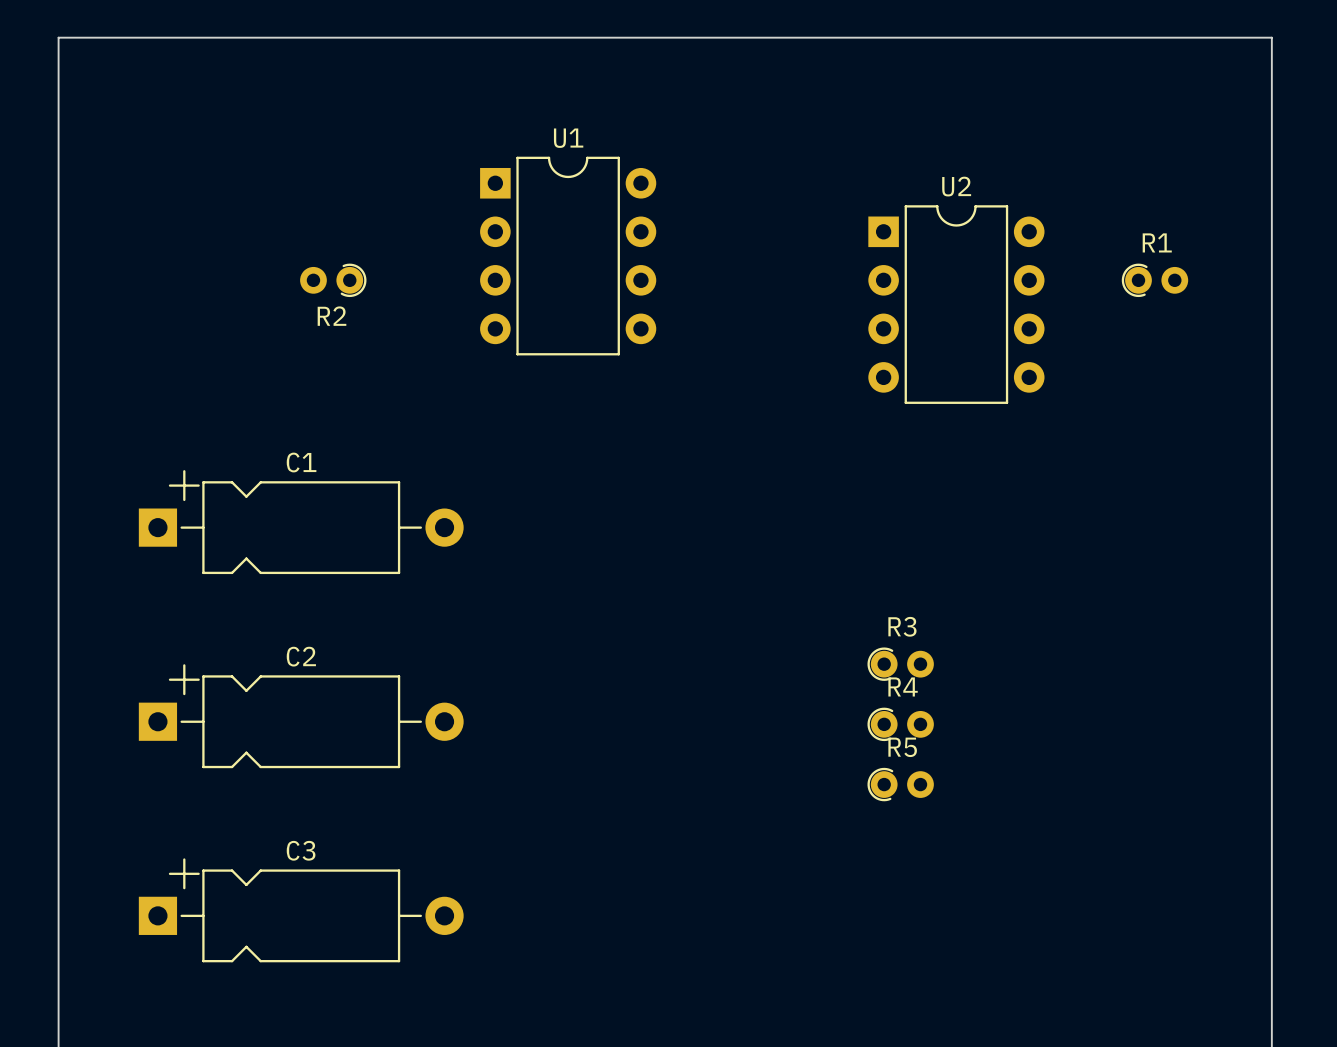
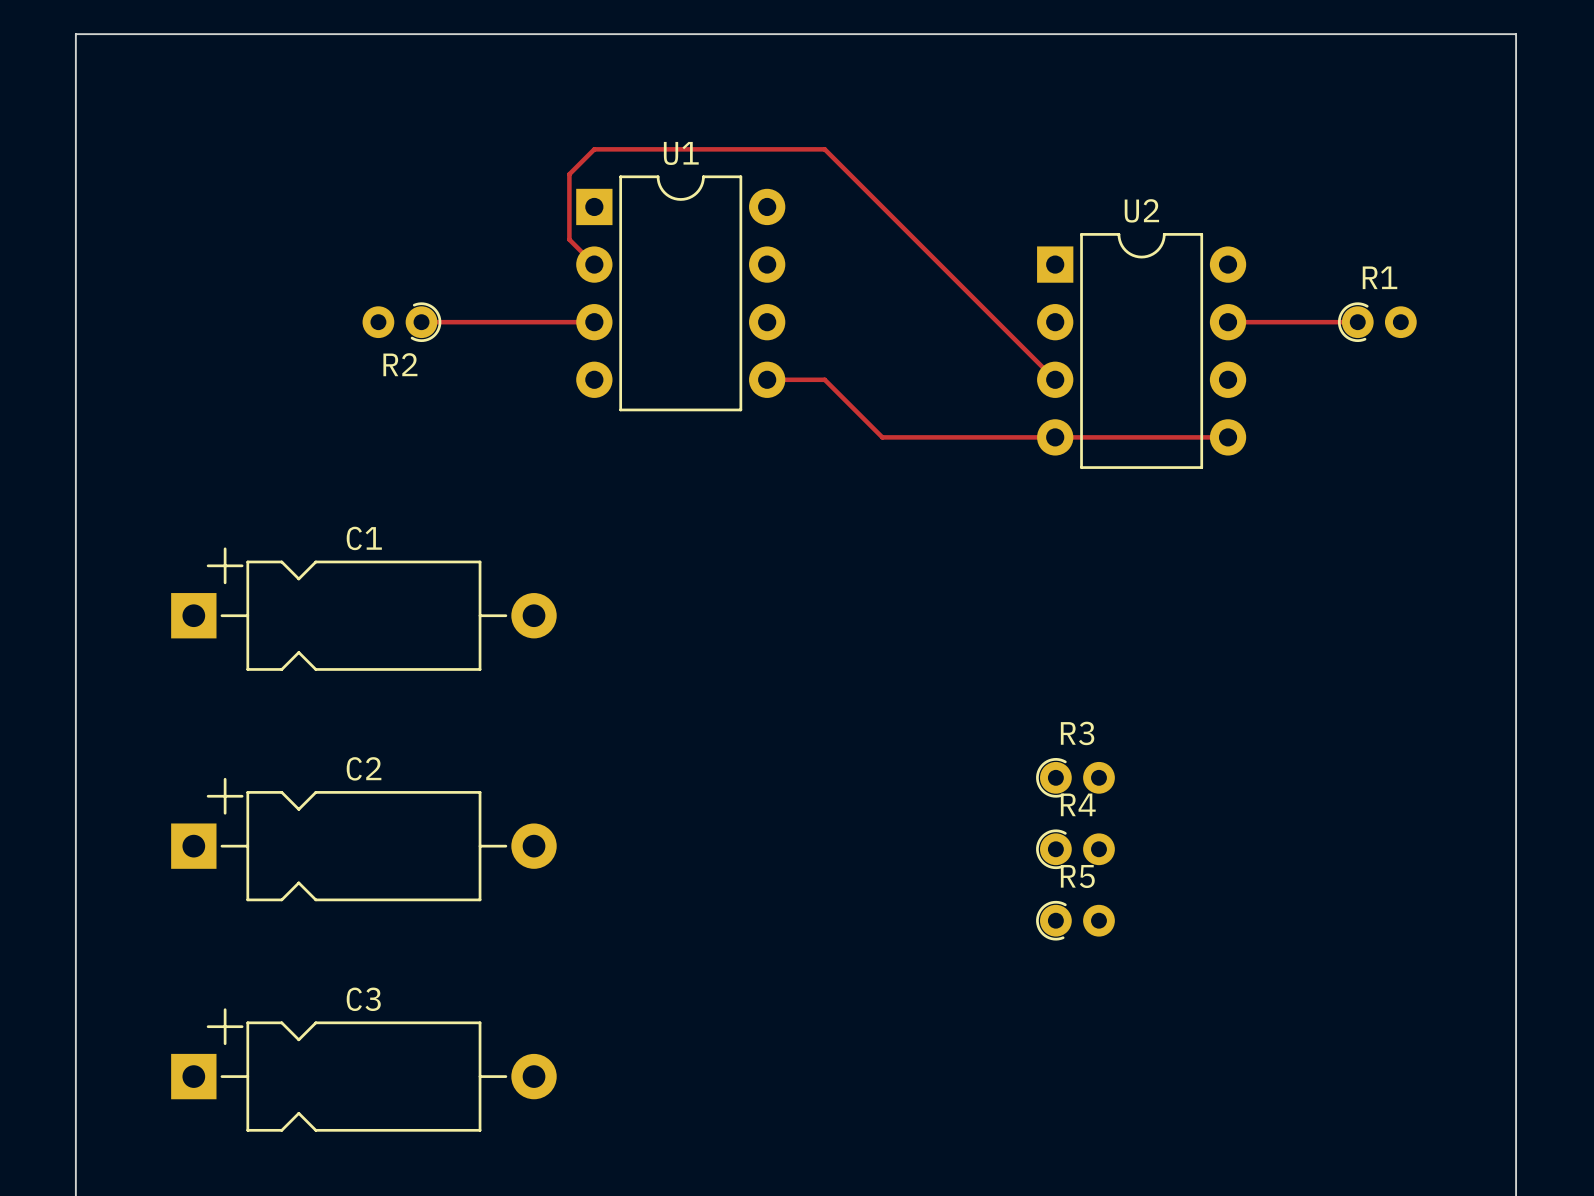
track: none -> (594, 264) (569, 239) (569, 174) (594, 149) (824, 149) (1055, 379)
track: none -> (421, 322) (594, 322)
track: none -> (1228, 322) (1357, 322)
track: none -> (767, 379) (824, 379) (882, 437) (1228, 437)

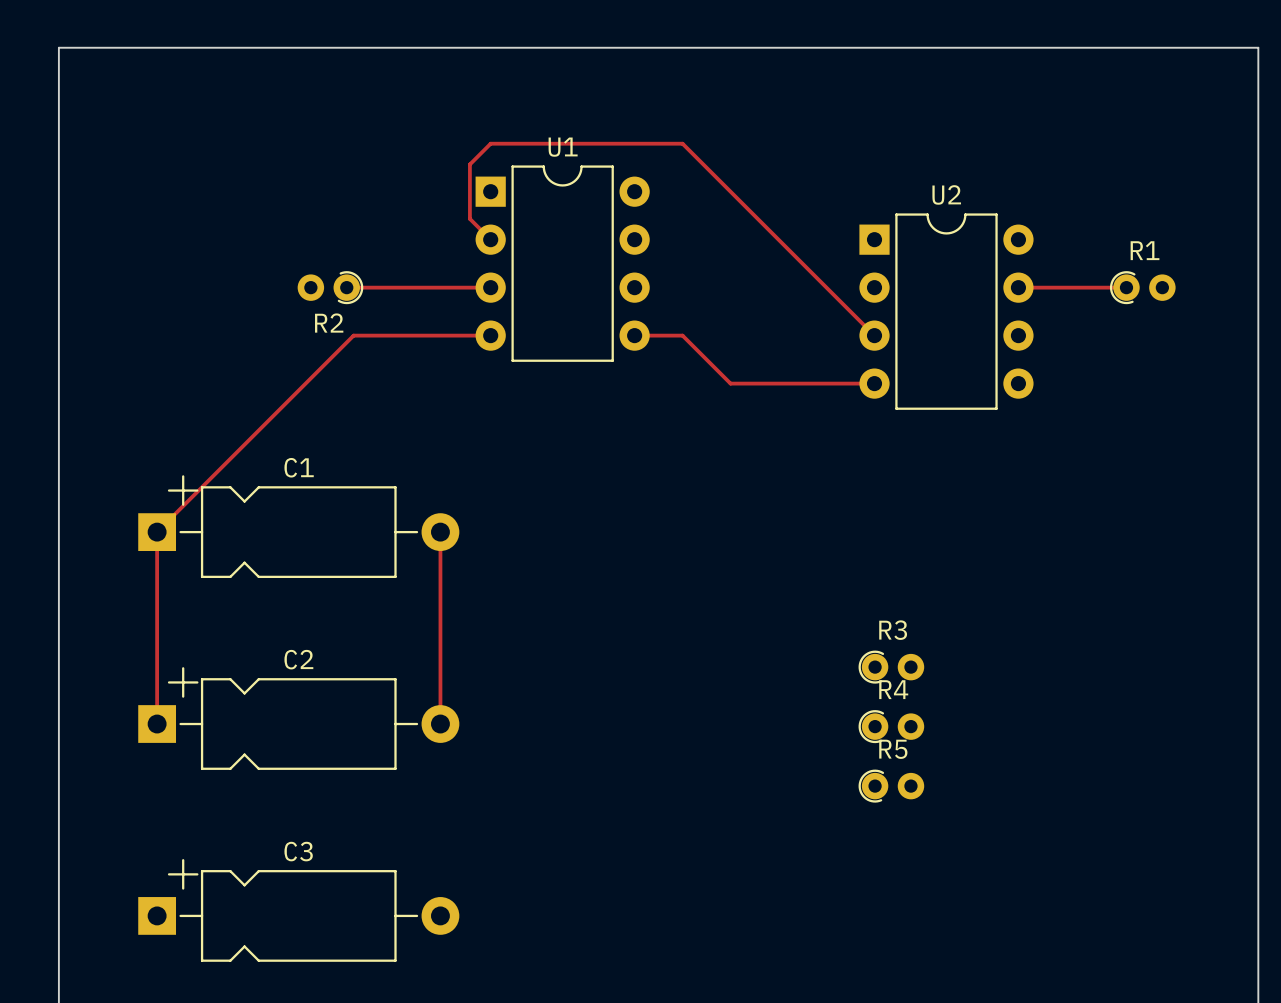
track: none -> (490, 335) (353, 335) (157, 532) (157, 724)
track: (1055, 437) (1228, 437) -> none
track: none -> (440, 532) (440, 724)

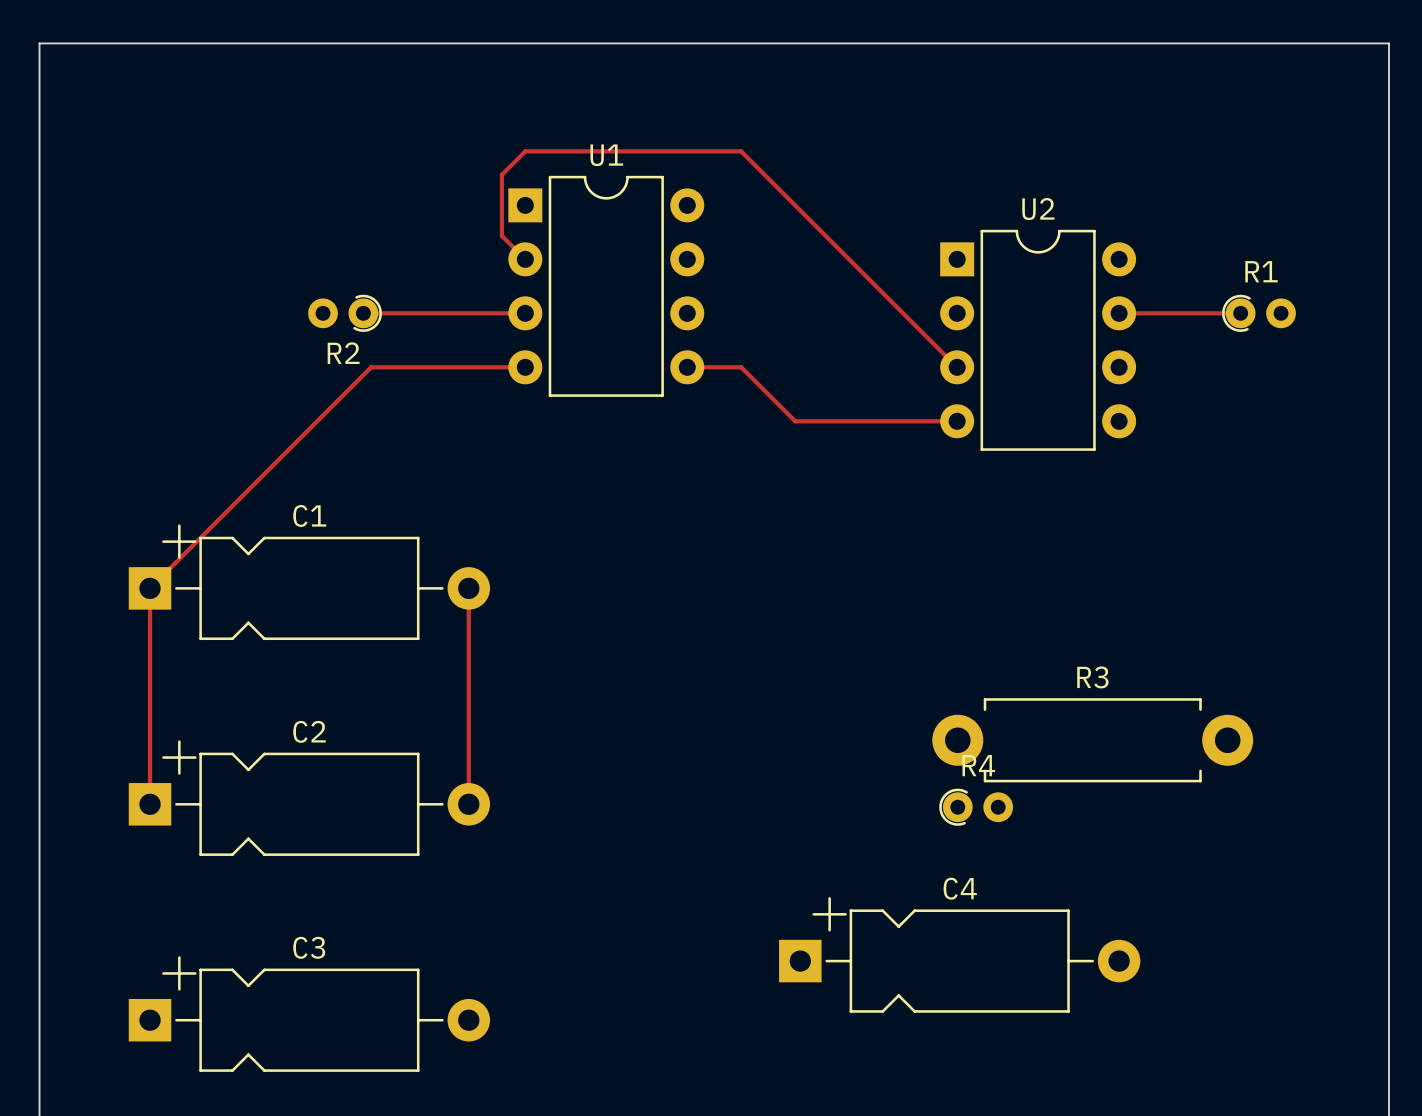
R3 footprint: [858, 650, 925, 684] -> [932, 698, 1254, 783]
R5: (891, 786) -> none
C4: none -> (959, 954)

